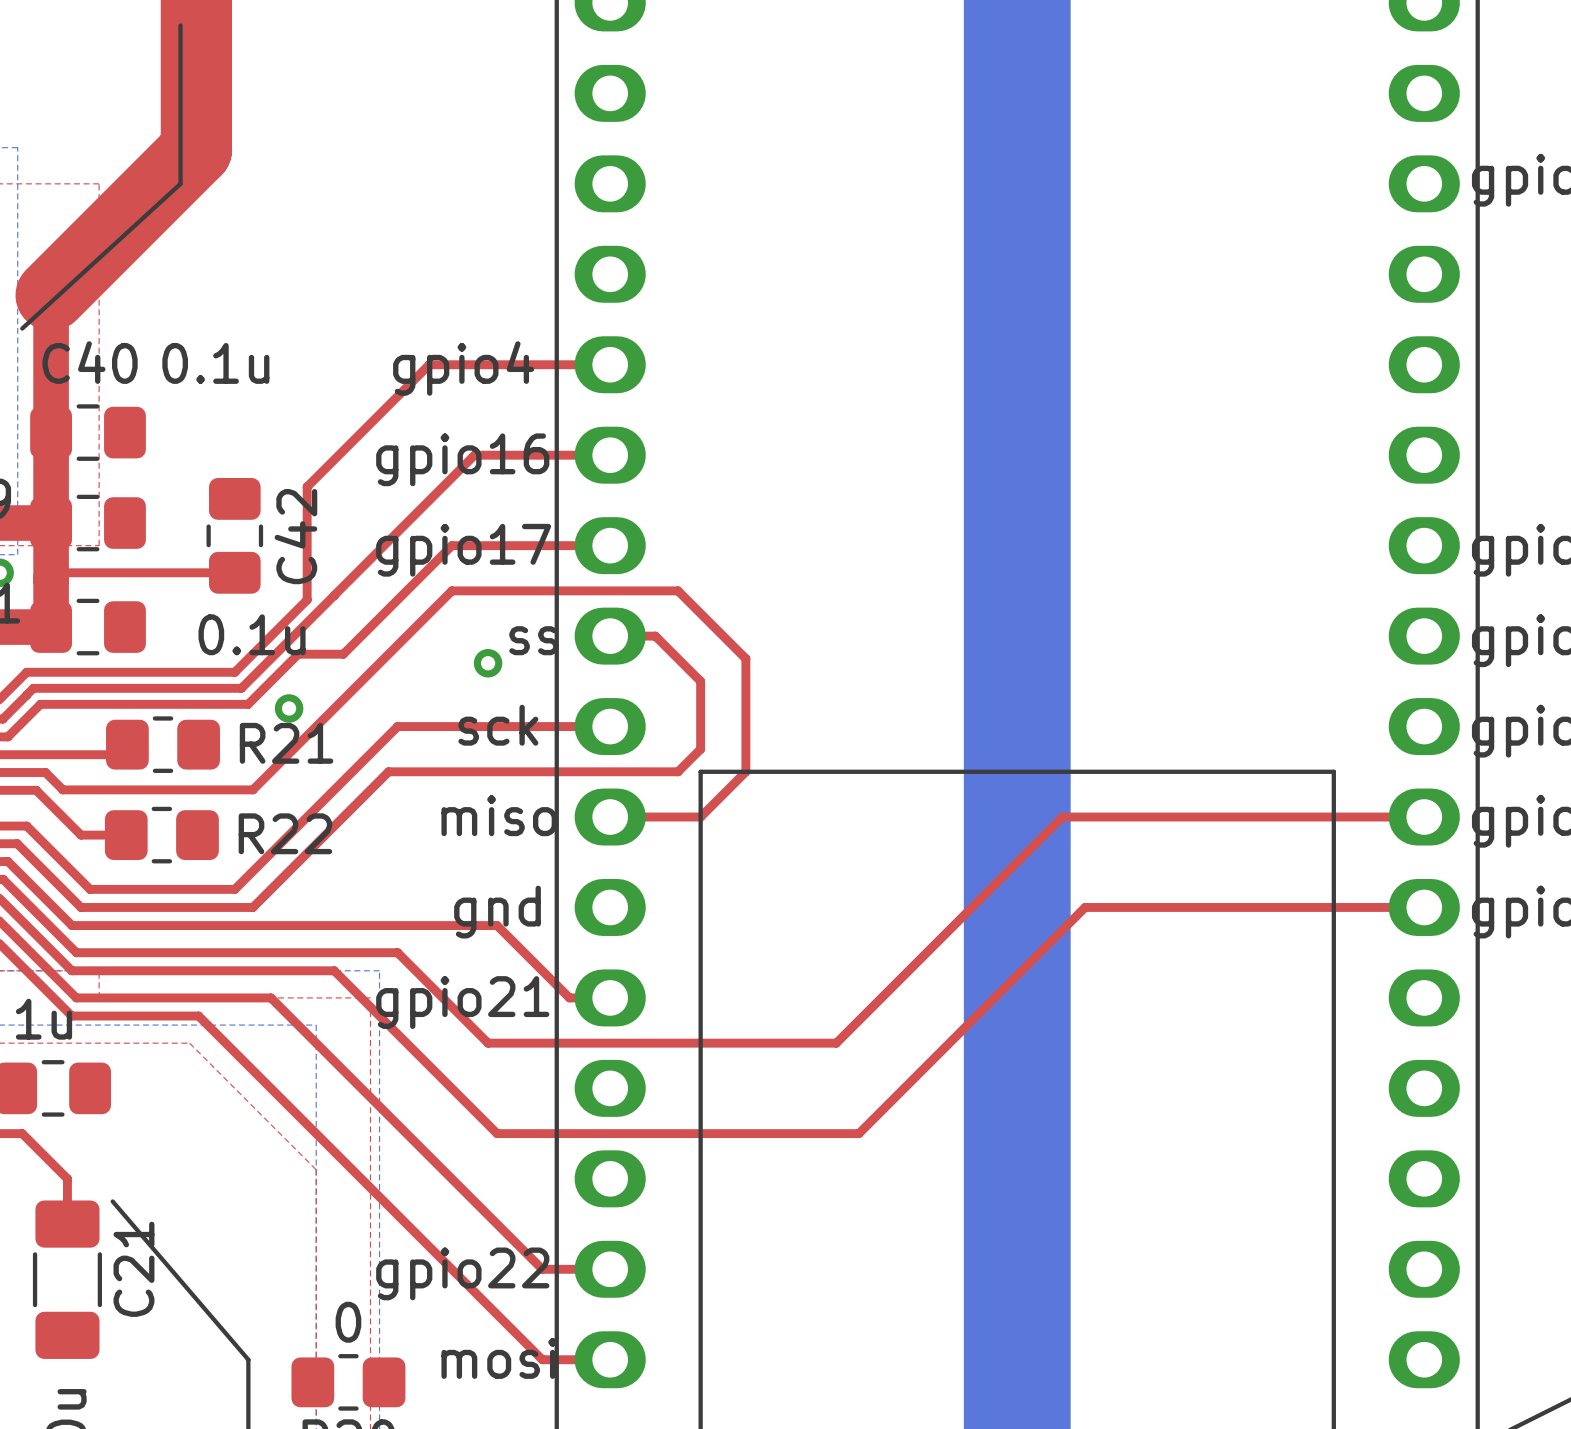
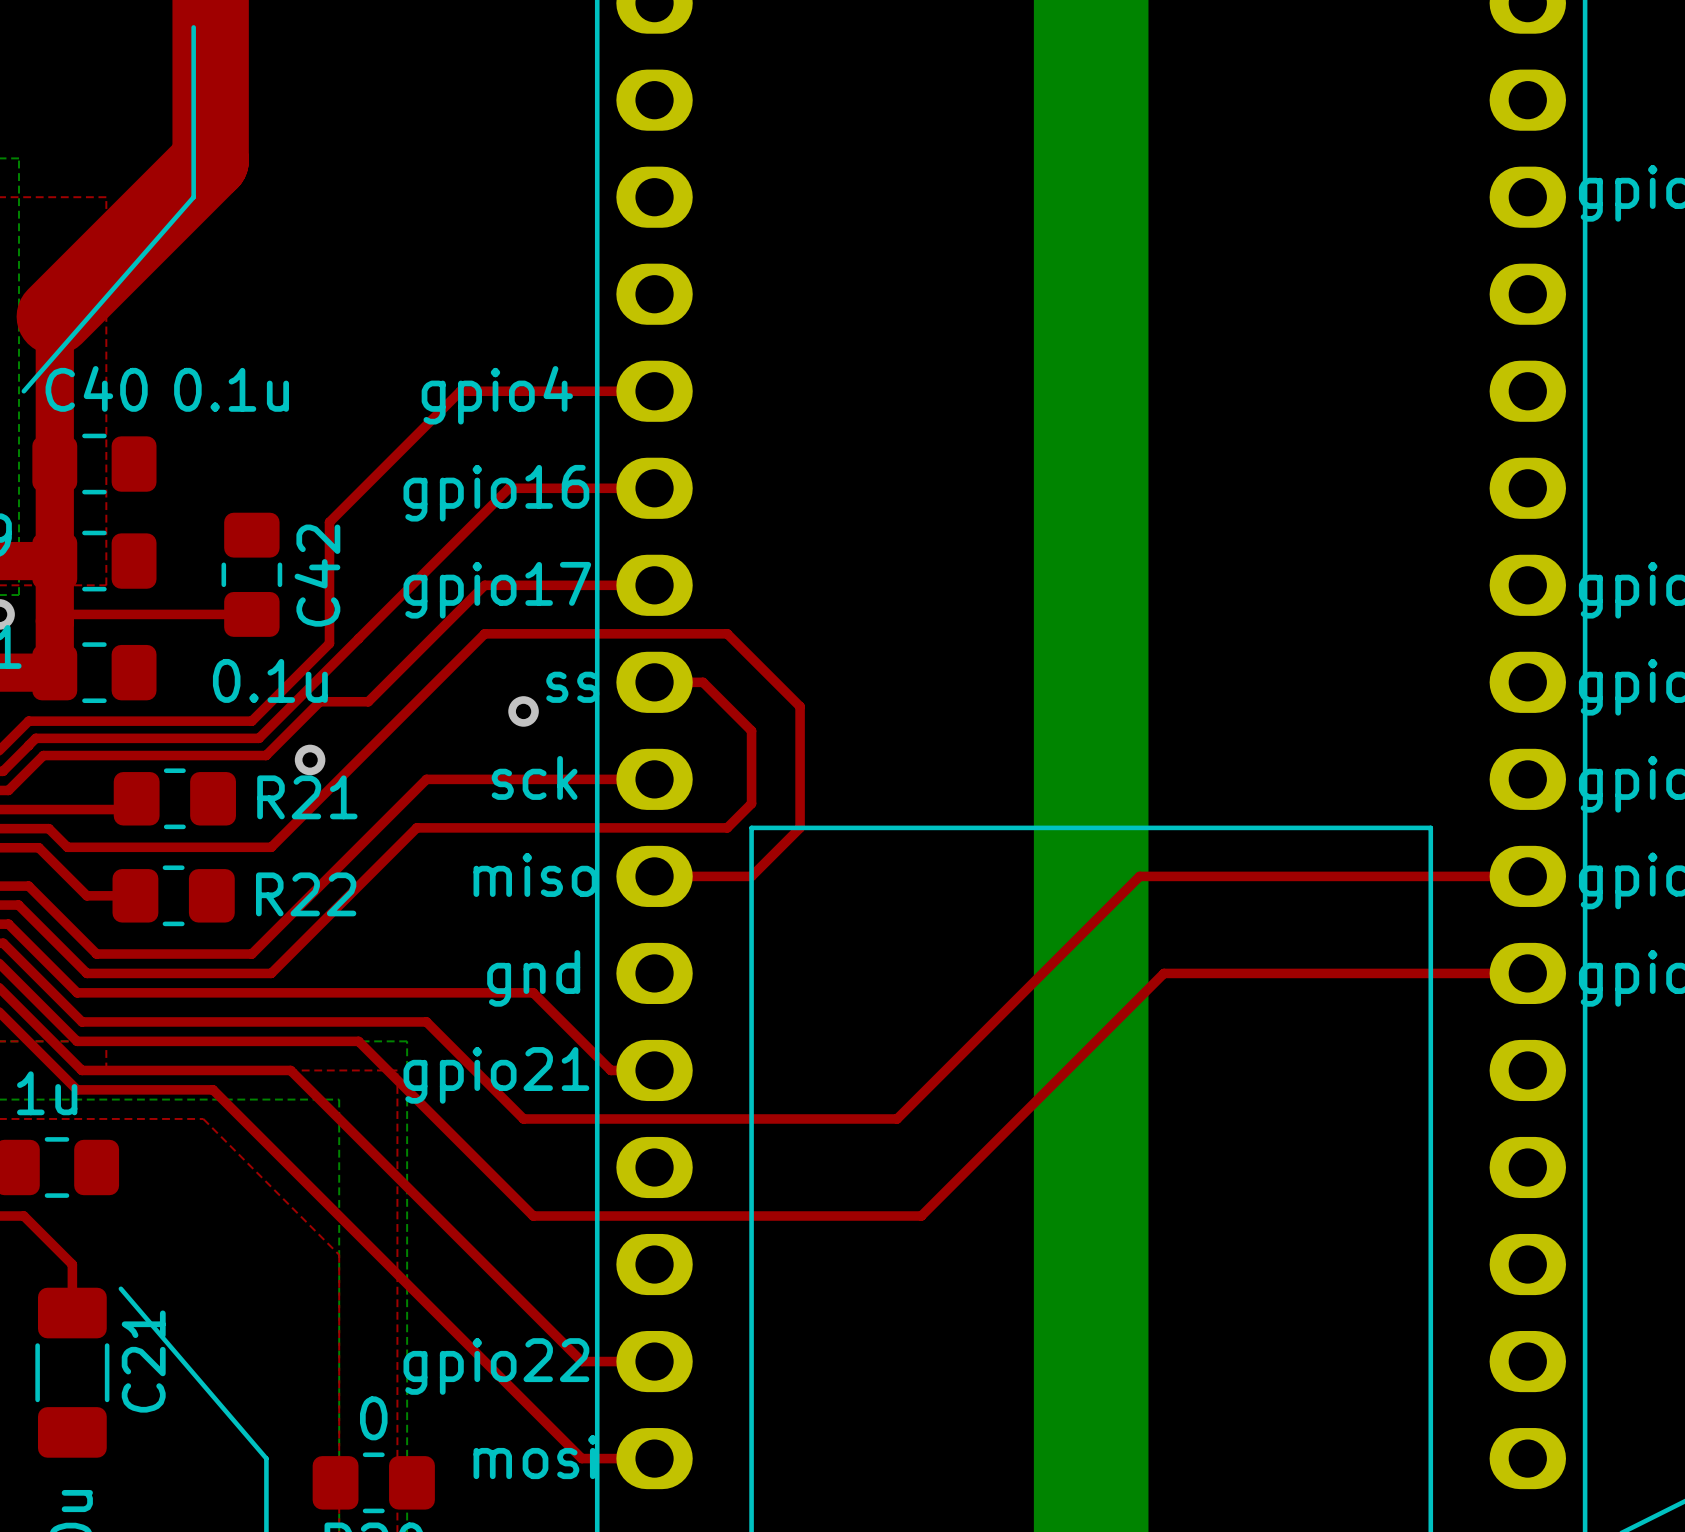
line: (180, 183) (22, 328) -> (193, 197) (23, 391)

